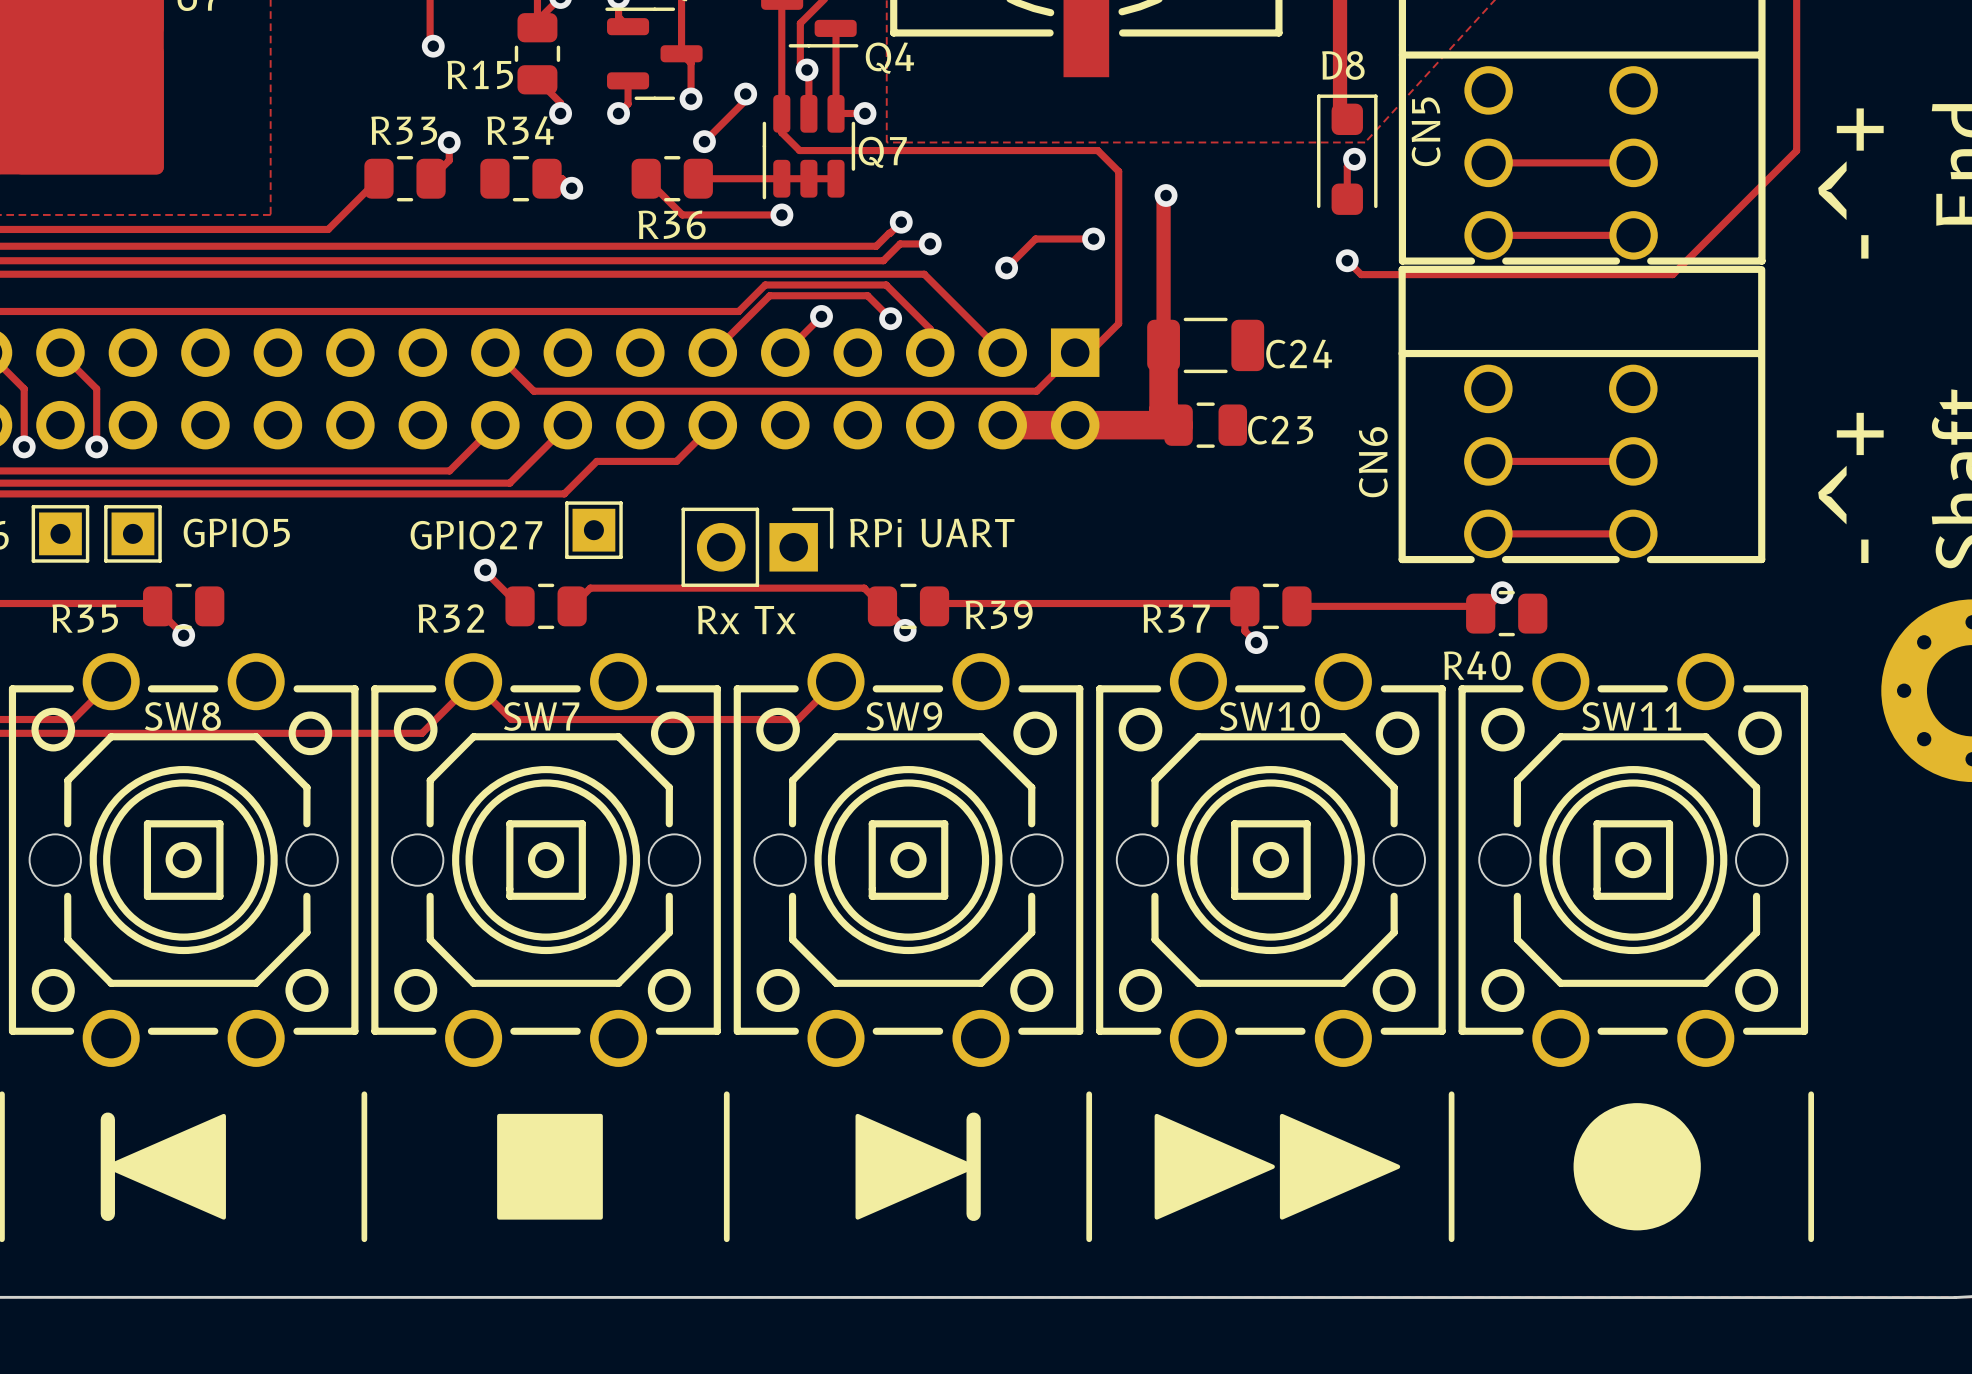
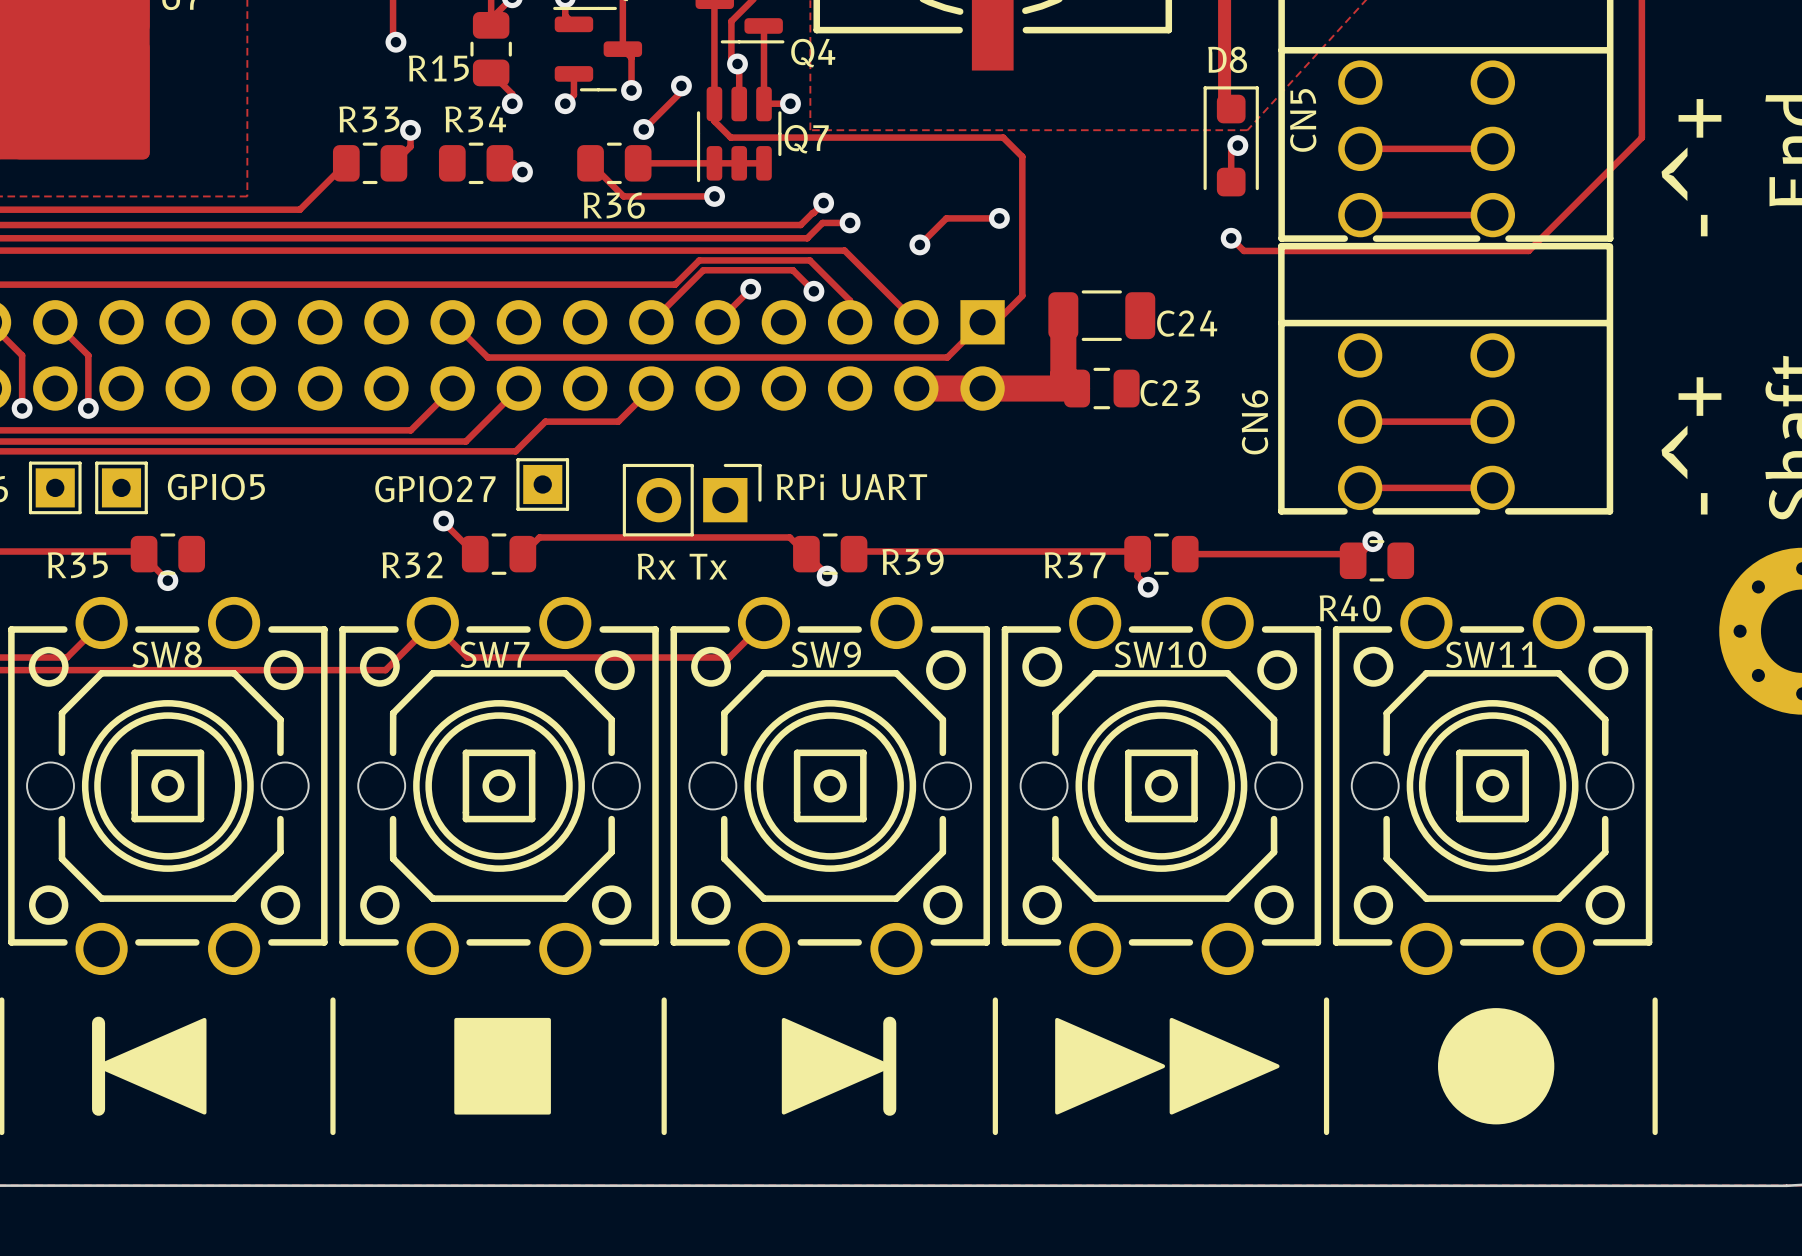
track: (1166, 195) (1163, 198) (1163, 345) -> none
via: (1166, 195) -> none

